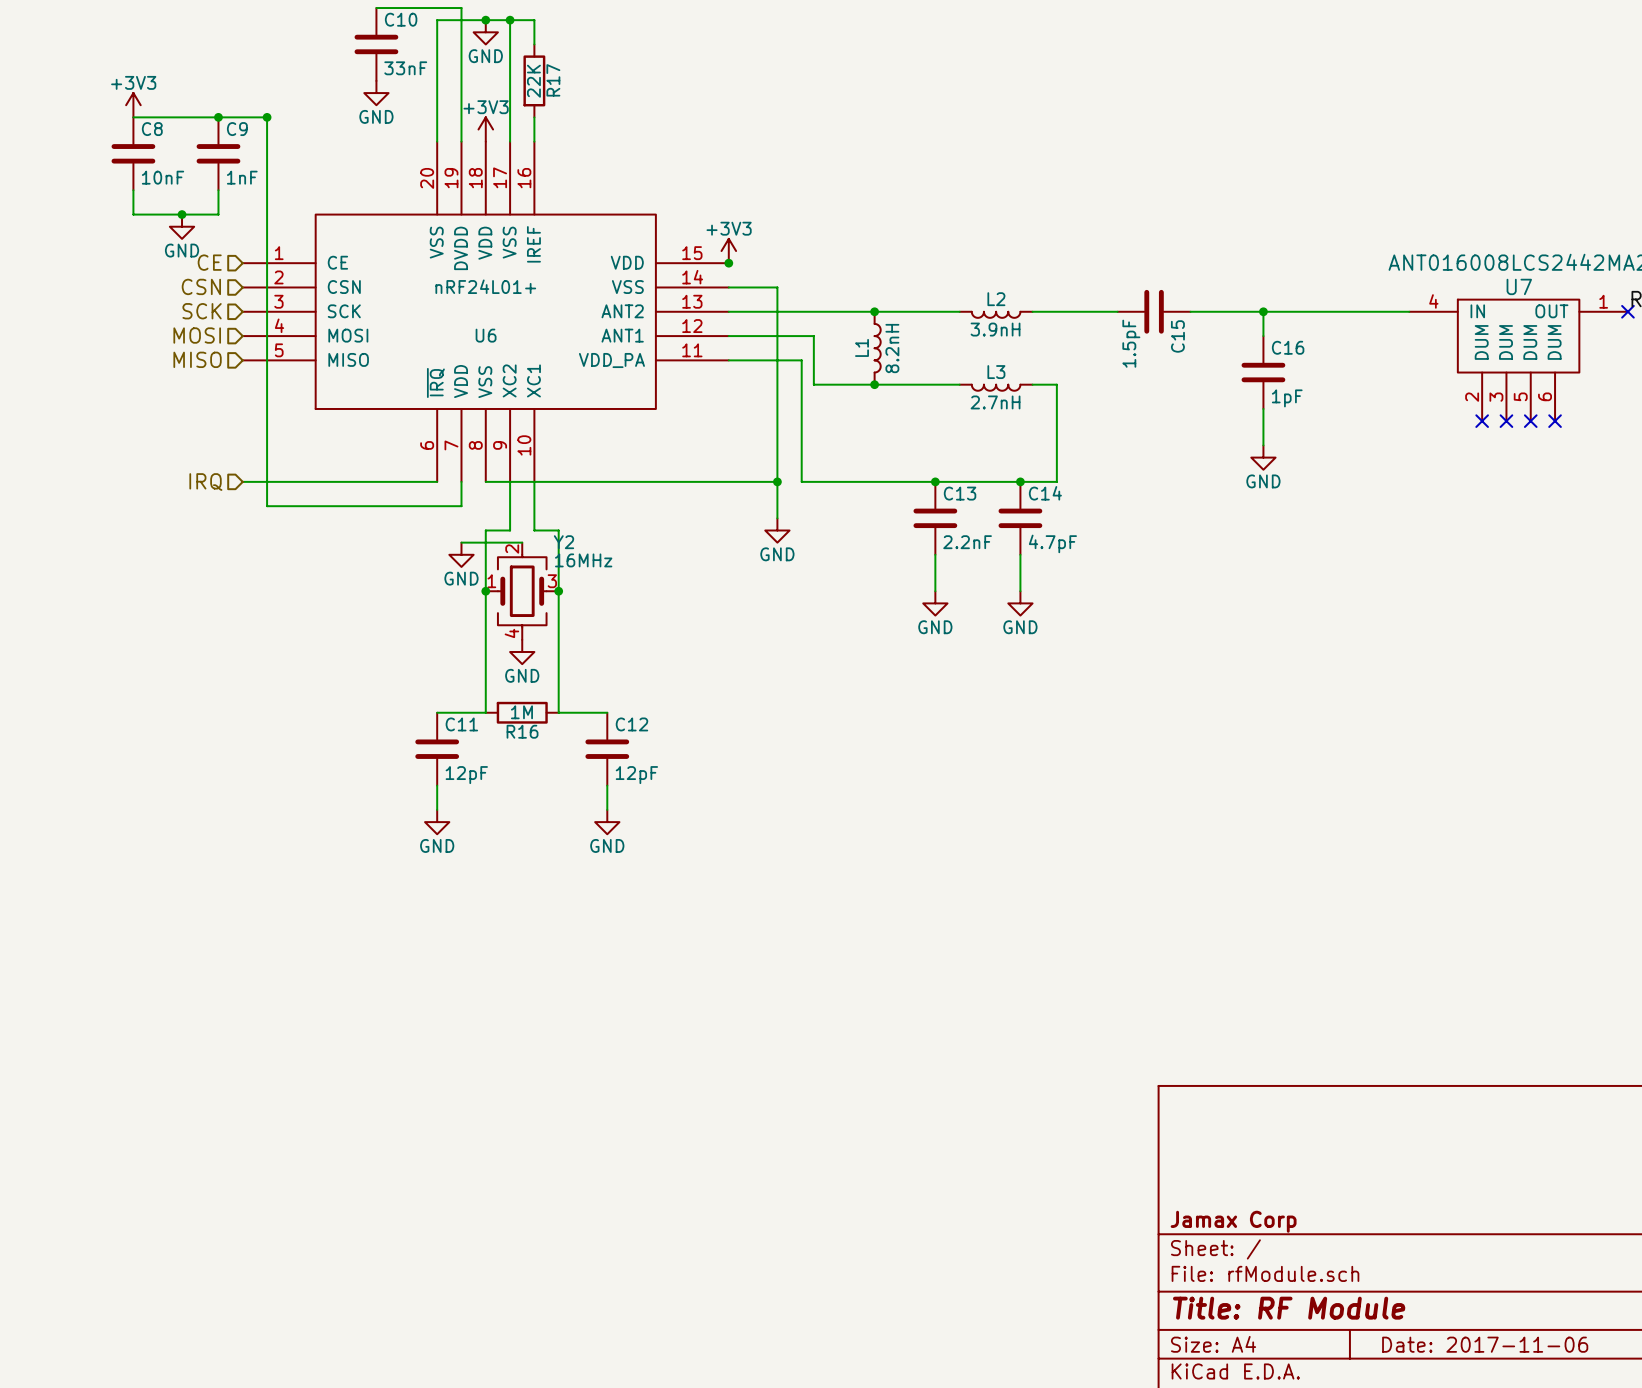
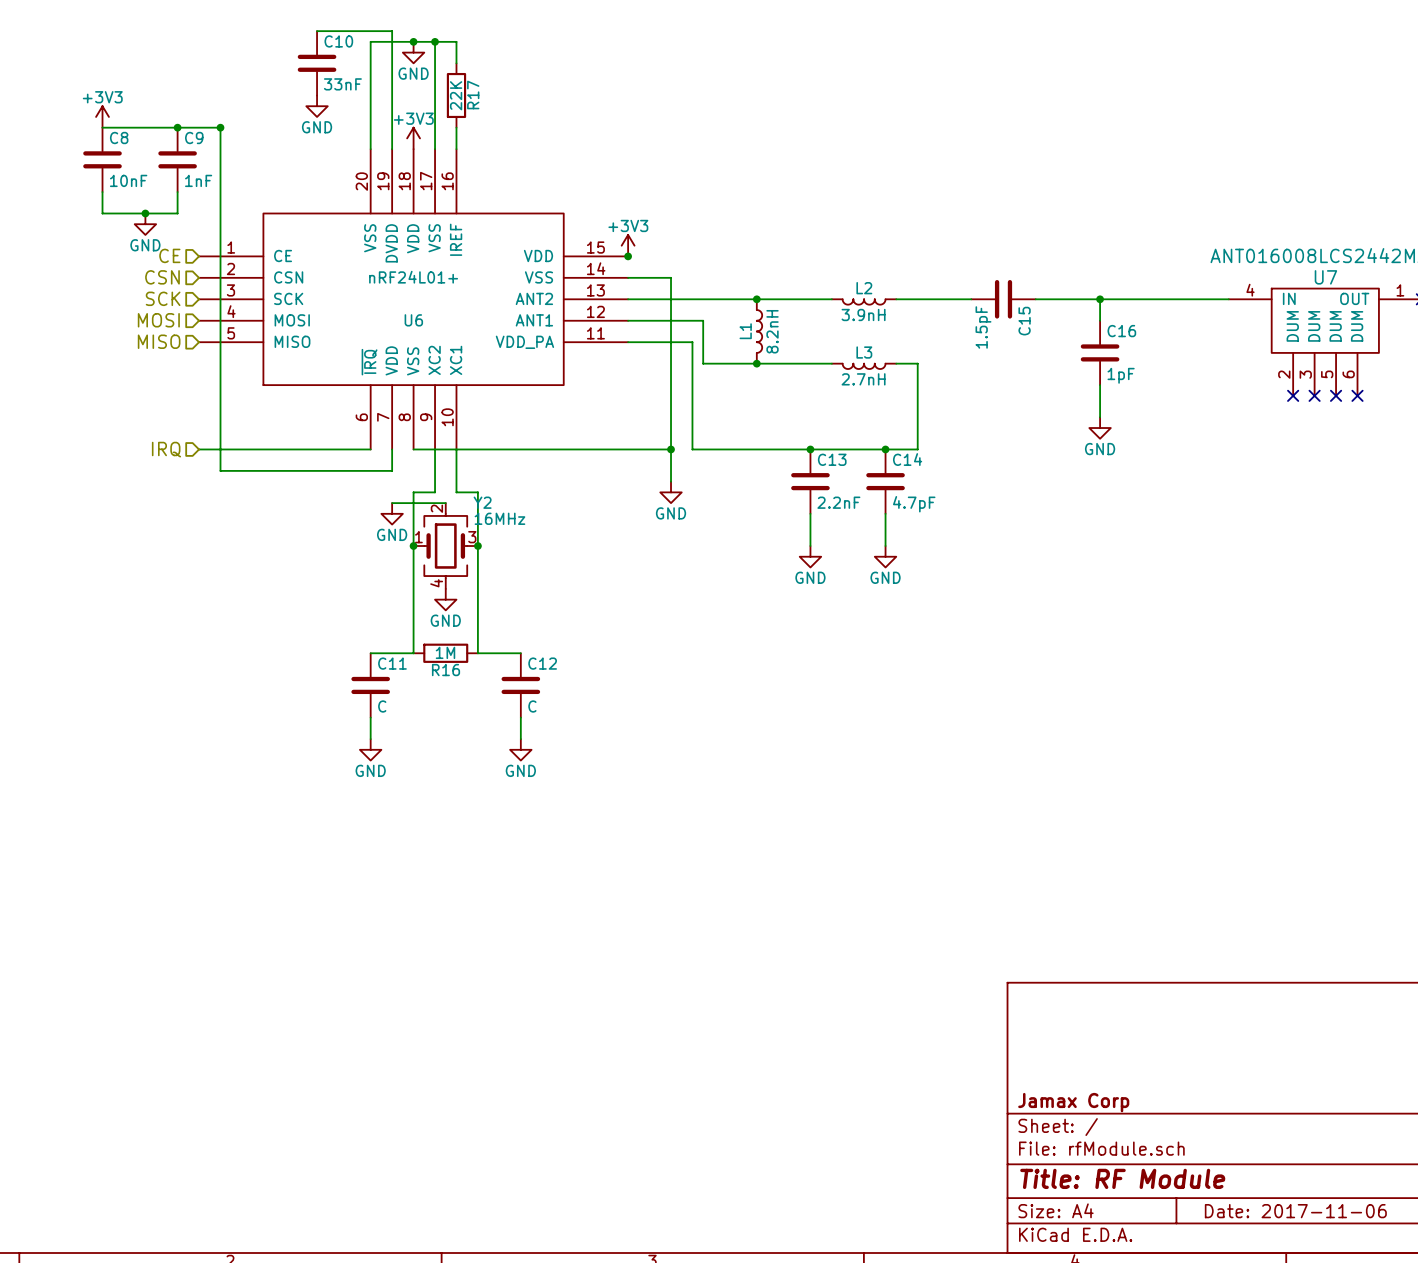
C11 value: 12pF (466, 775) -> C (382, 706)
C12 value: 12pF (636, 775) -> C (532, 706)

